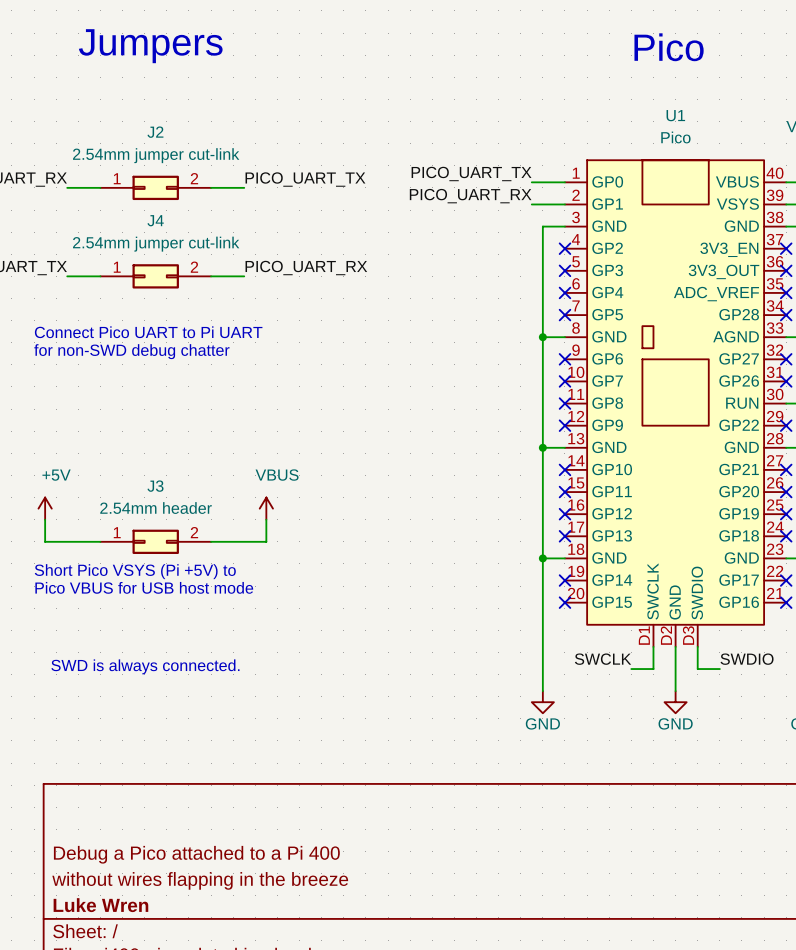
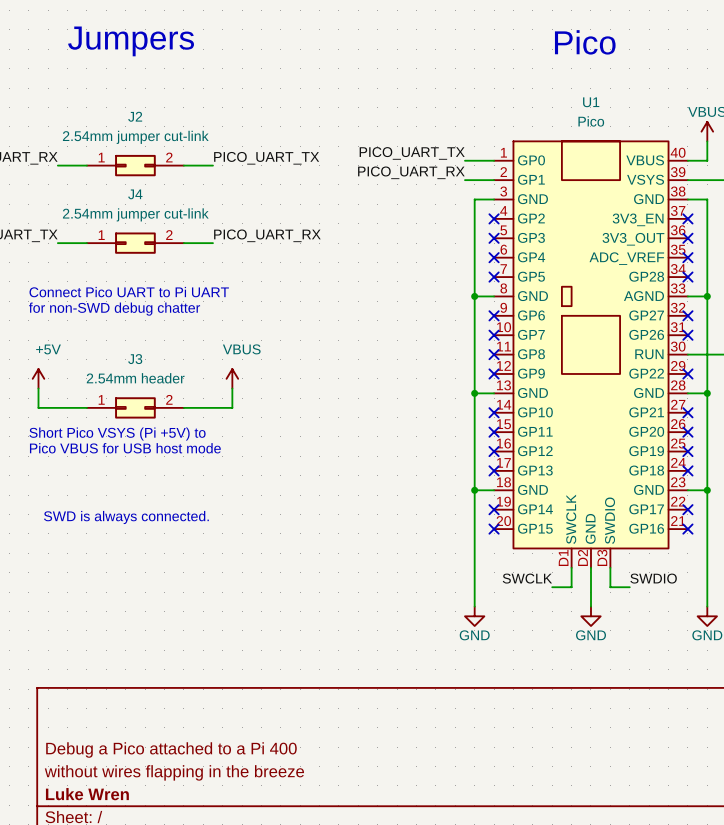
power symbol position: +5V (45, 508) -> +5V (38, 378)
power symbol position: VBUS (266, 508) -> VBUS (232, 378)
wire: (45, 519) (45, 541) (100, 541) -> (38, 388) (38, 407) (86, 407)
wire: (266, 519) (266, 541) (211, 541) -> (232, 388) (232, 407) (183, 407)
J3 position: (155, 541) -> (135, 407)
text position: Short Pico VSYS (Pi +5V) to (135, 571) -> Short Pico VSYS (Pi +5V) to (117, 434)
text position: Pico VBUS for USB host mode (144, 587) -> Pico VBUS for USB host mode (125, 448)
text position: SWD is always connected. (145, 666) -> SWD is always connected. (126, 517)

